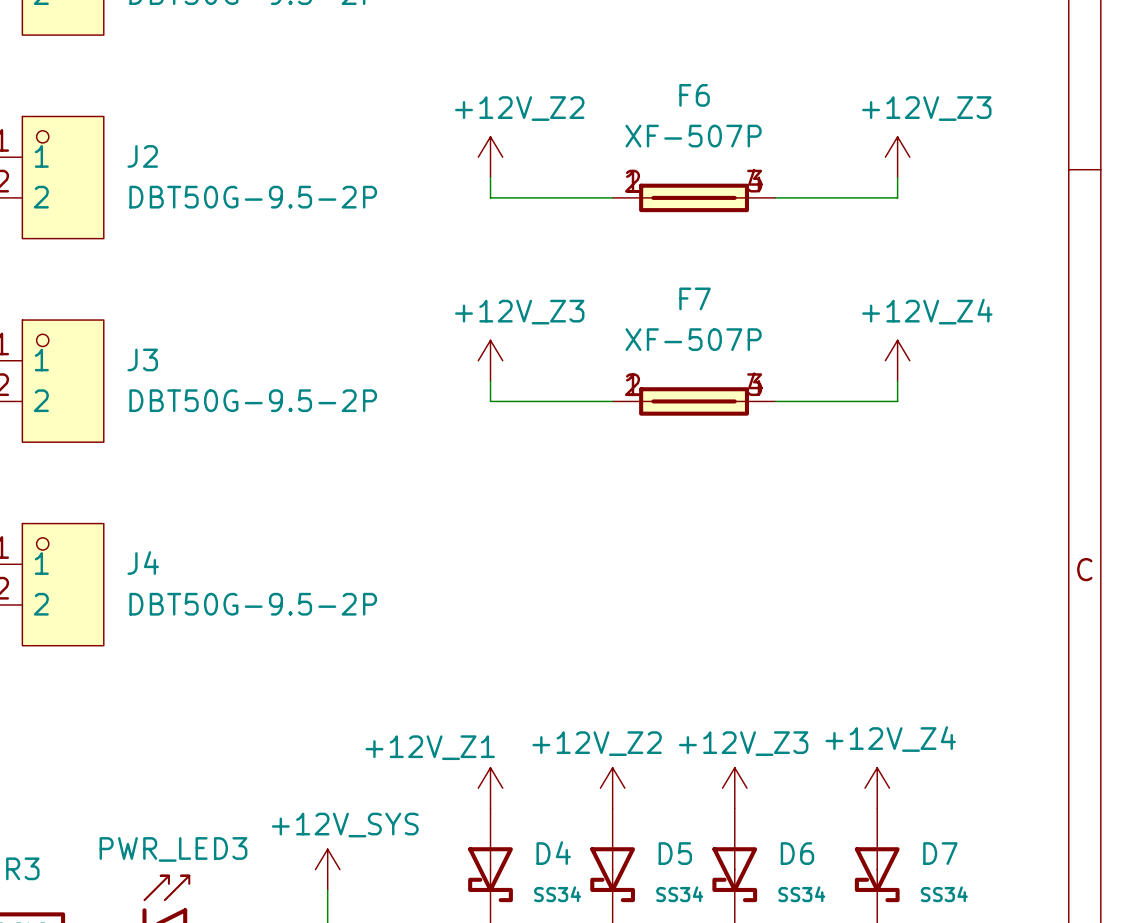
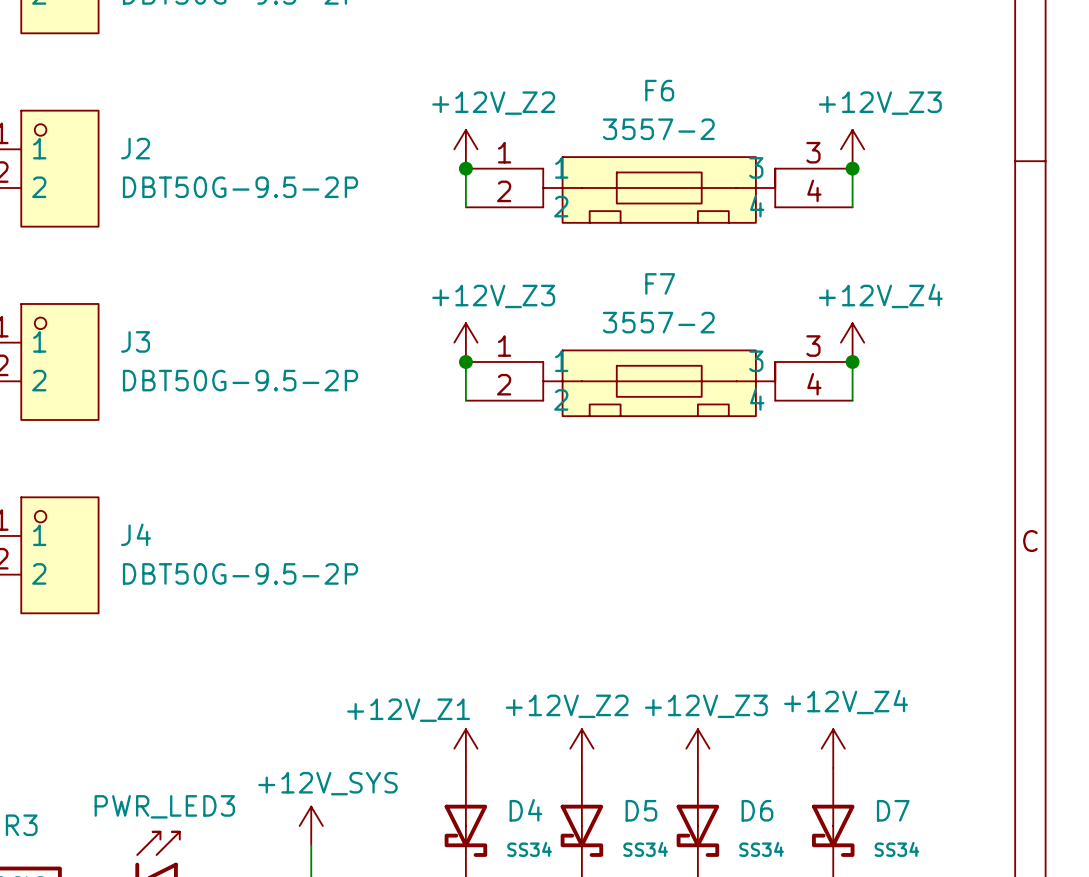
F6 value: XF-507P (693, 136) -> 3557-2 (658, 129)
junction: none -> (465, 168)
junction: none -> (852, 168)
F6 symbol: [612, 183, 776, 213] -> [465, 157, 853, 223]
wire: (490, 197) (612, 197) -> (465, 187) (465, 207)
wire: (775, 197) (897, 197) -> (852, 207) (852, 187)
F7 value: XF-507P (693, 339) -> 3557-2 (658, 322)
junction: none -> (465, 361)
junction: none -> (852, 361)
F7 symbol: [612, 387, 776, 416] -> [465, 350, 853, 417]
wire: (490, 401) (612, 401) -> (465, 381) (465, 400)
wire: (775, 401) (897, 401) -> (852, 400) (852, 381)

